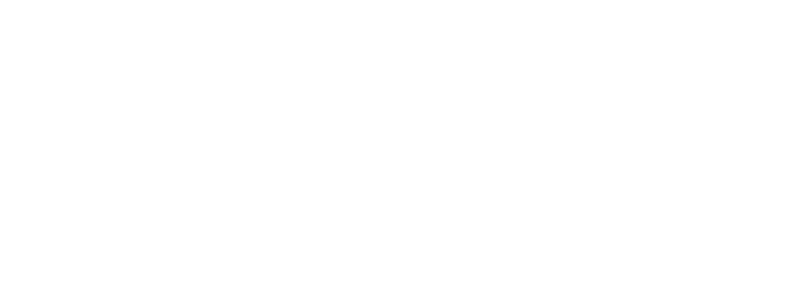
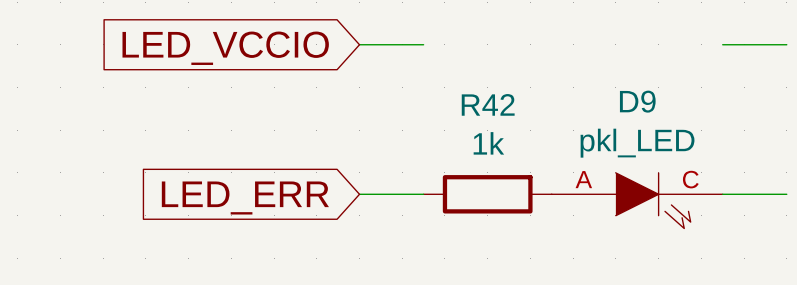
wire: none -> (359, 44) (423, 44)
wire: none -> (722, 44) (786, 44)
global label: none -> LED_VCCIO (225, 48)
wire: none -> (359, 194) (423, 194)
R42: none -> 1k (487, 194)
wire: none -> (722, 194) (786, 194)
global label: none -> LED_ERR (245, 198)
D9: none -> pkl_LED (637, 200)

